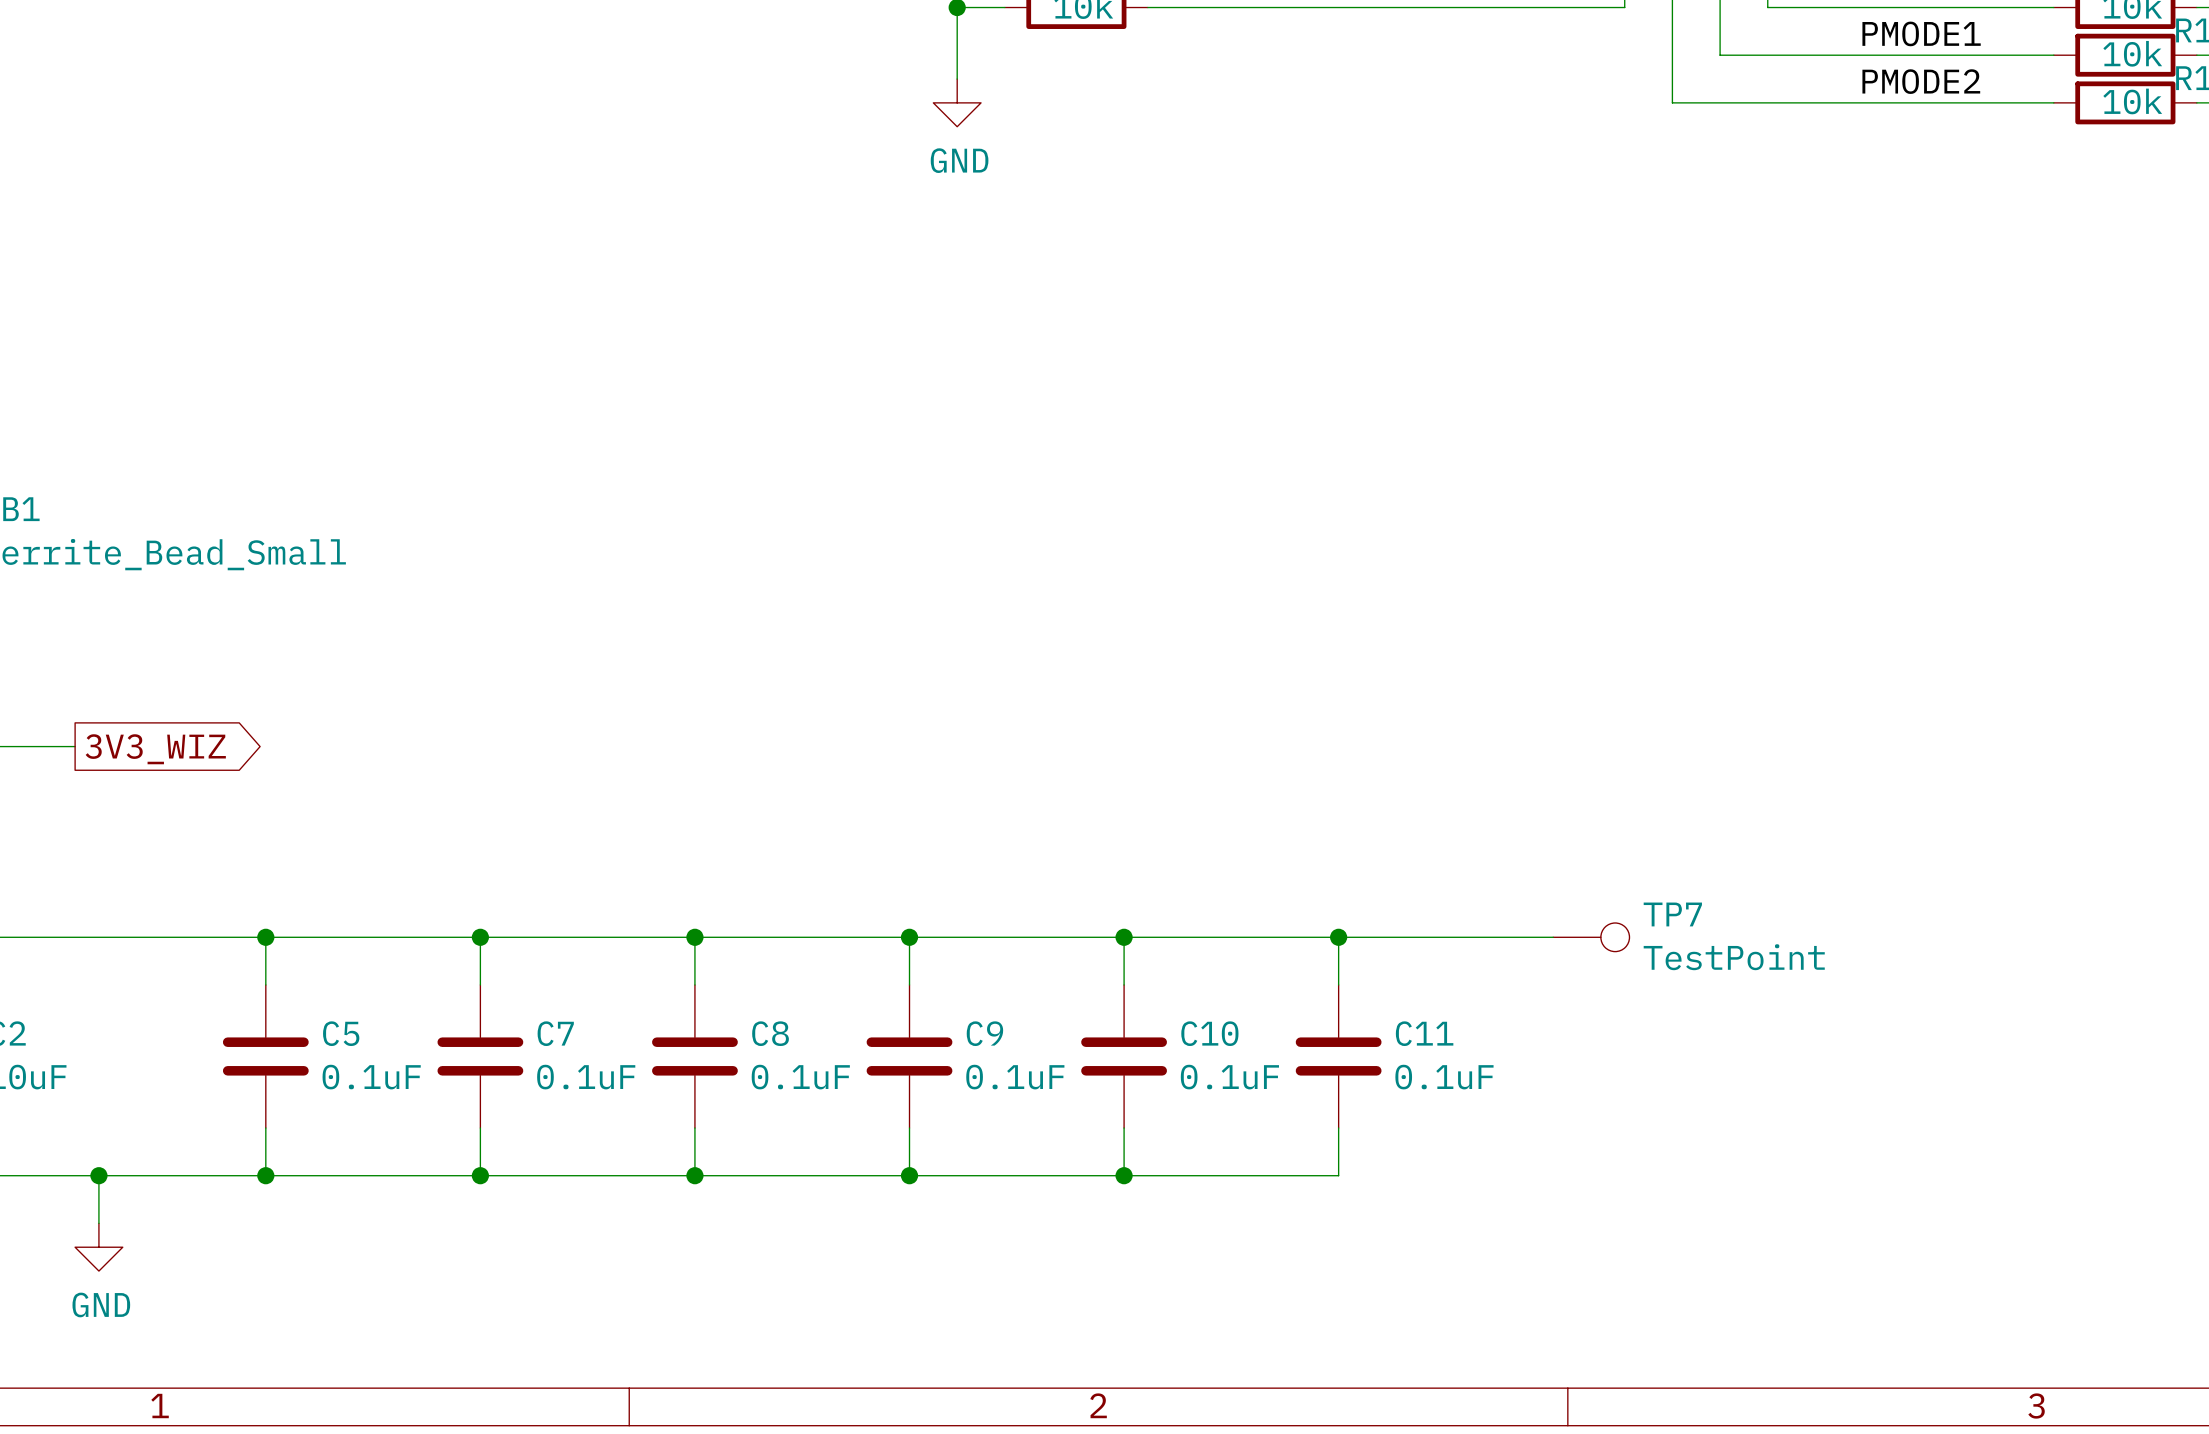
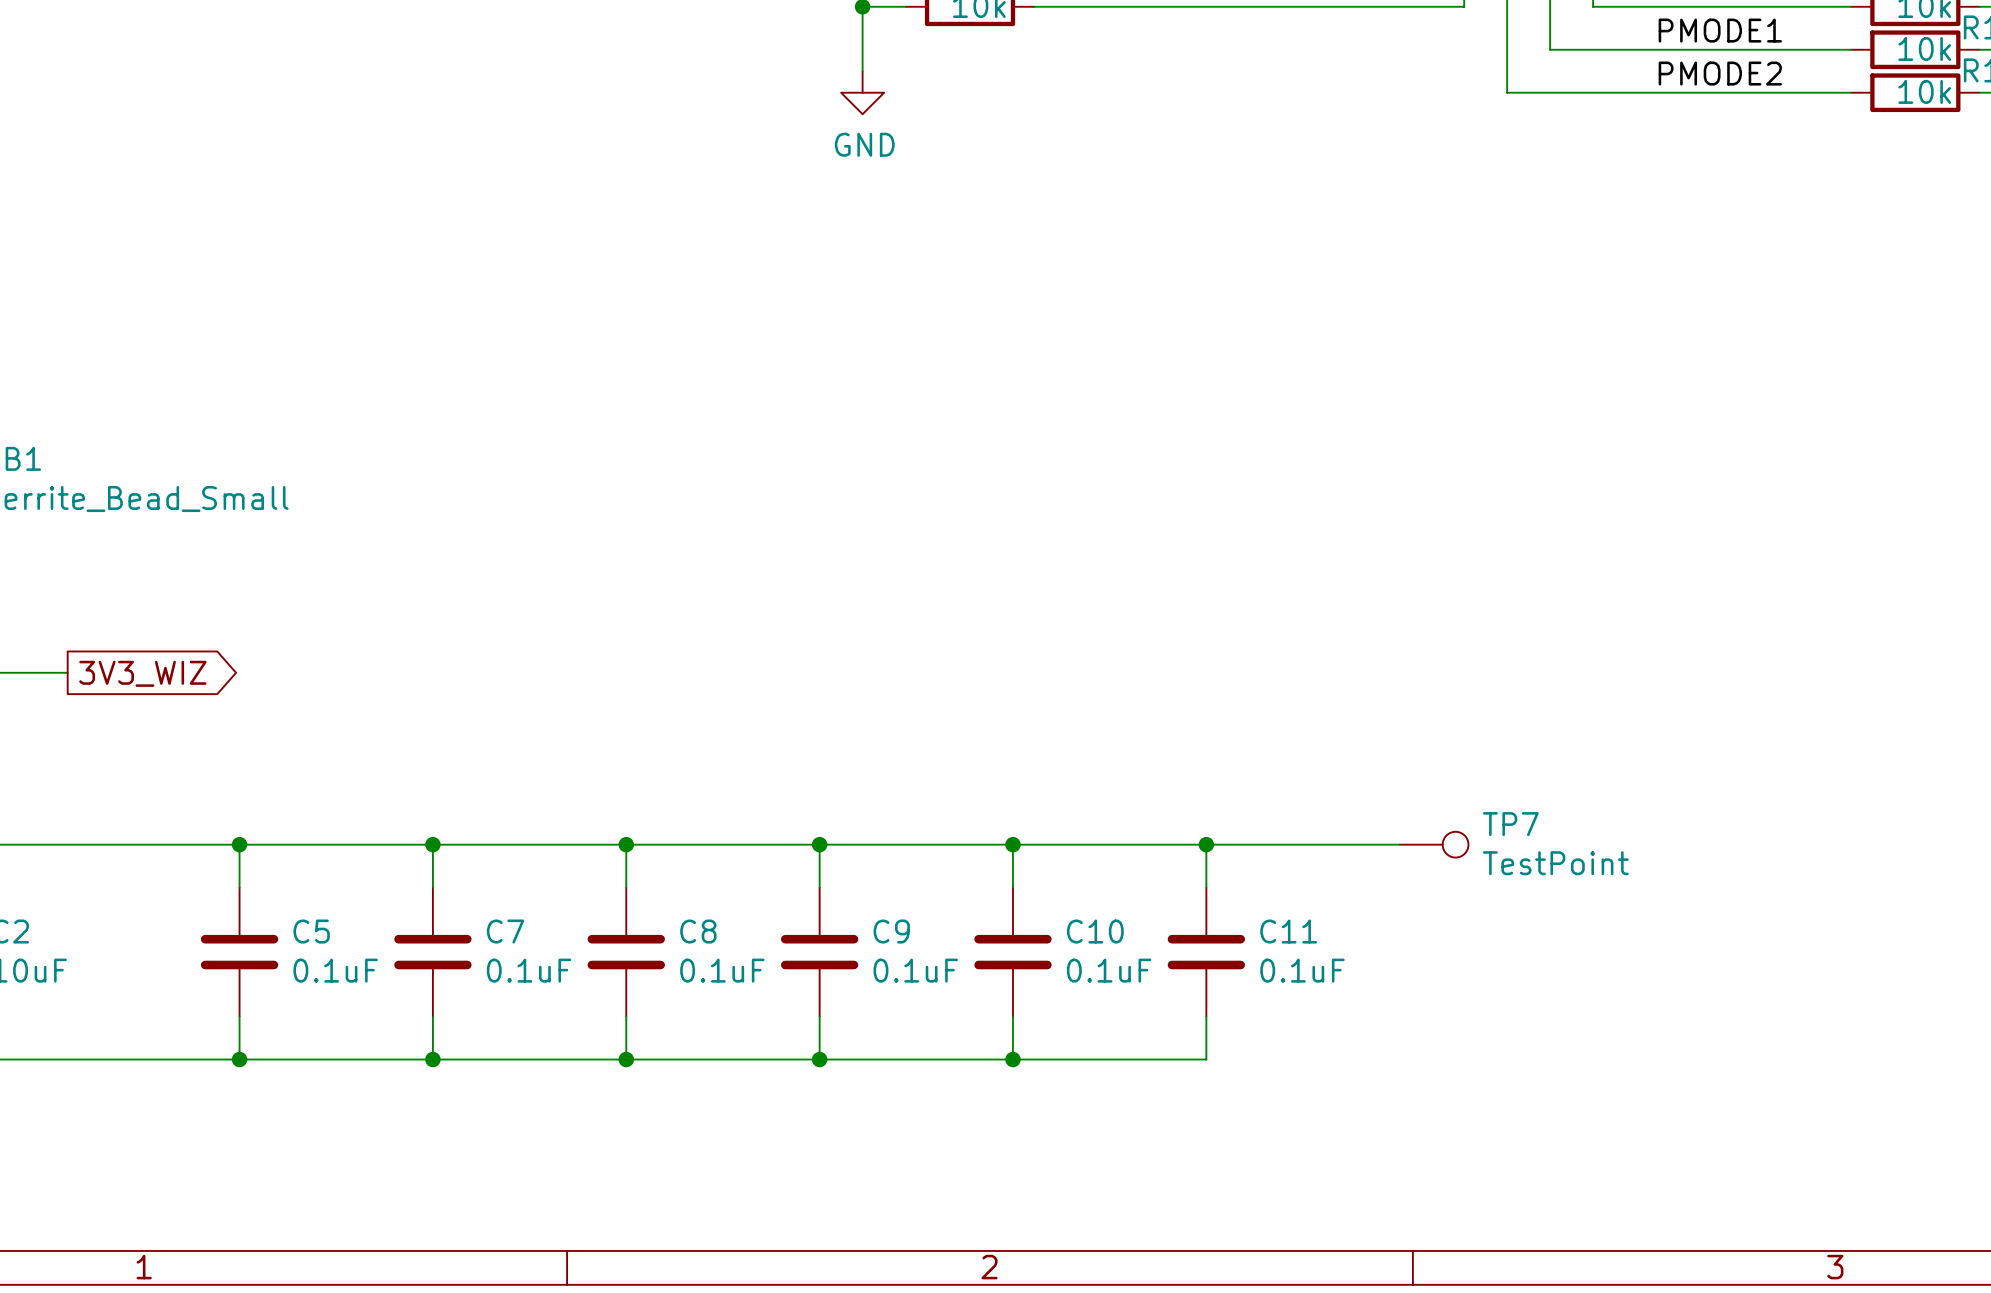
wire: (98, 1175) (98, 1223) -> none
junction: (98, 1175) -> none
power symbol: GND (98, 1247) -> none

